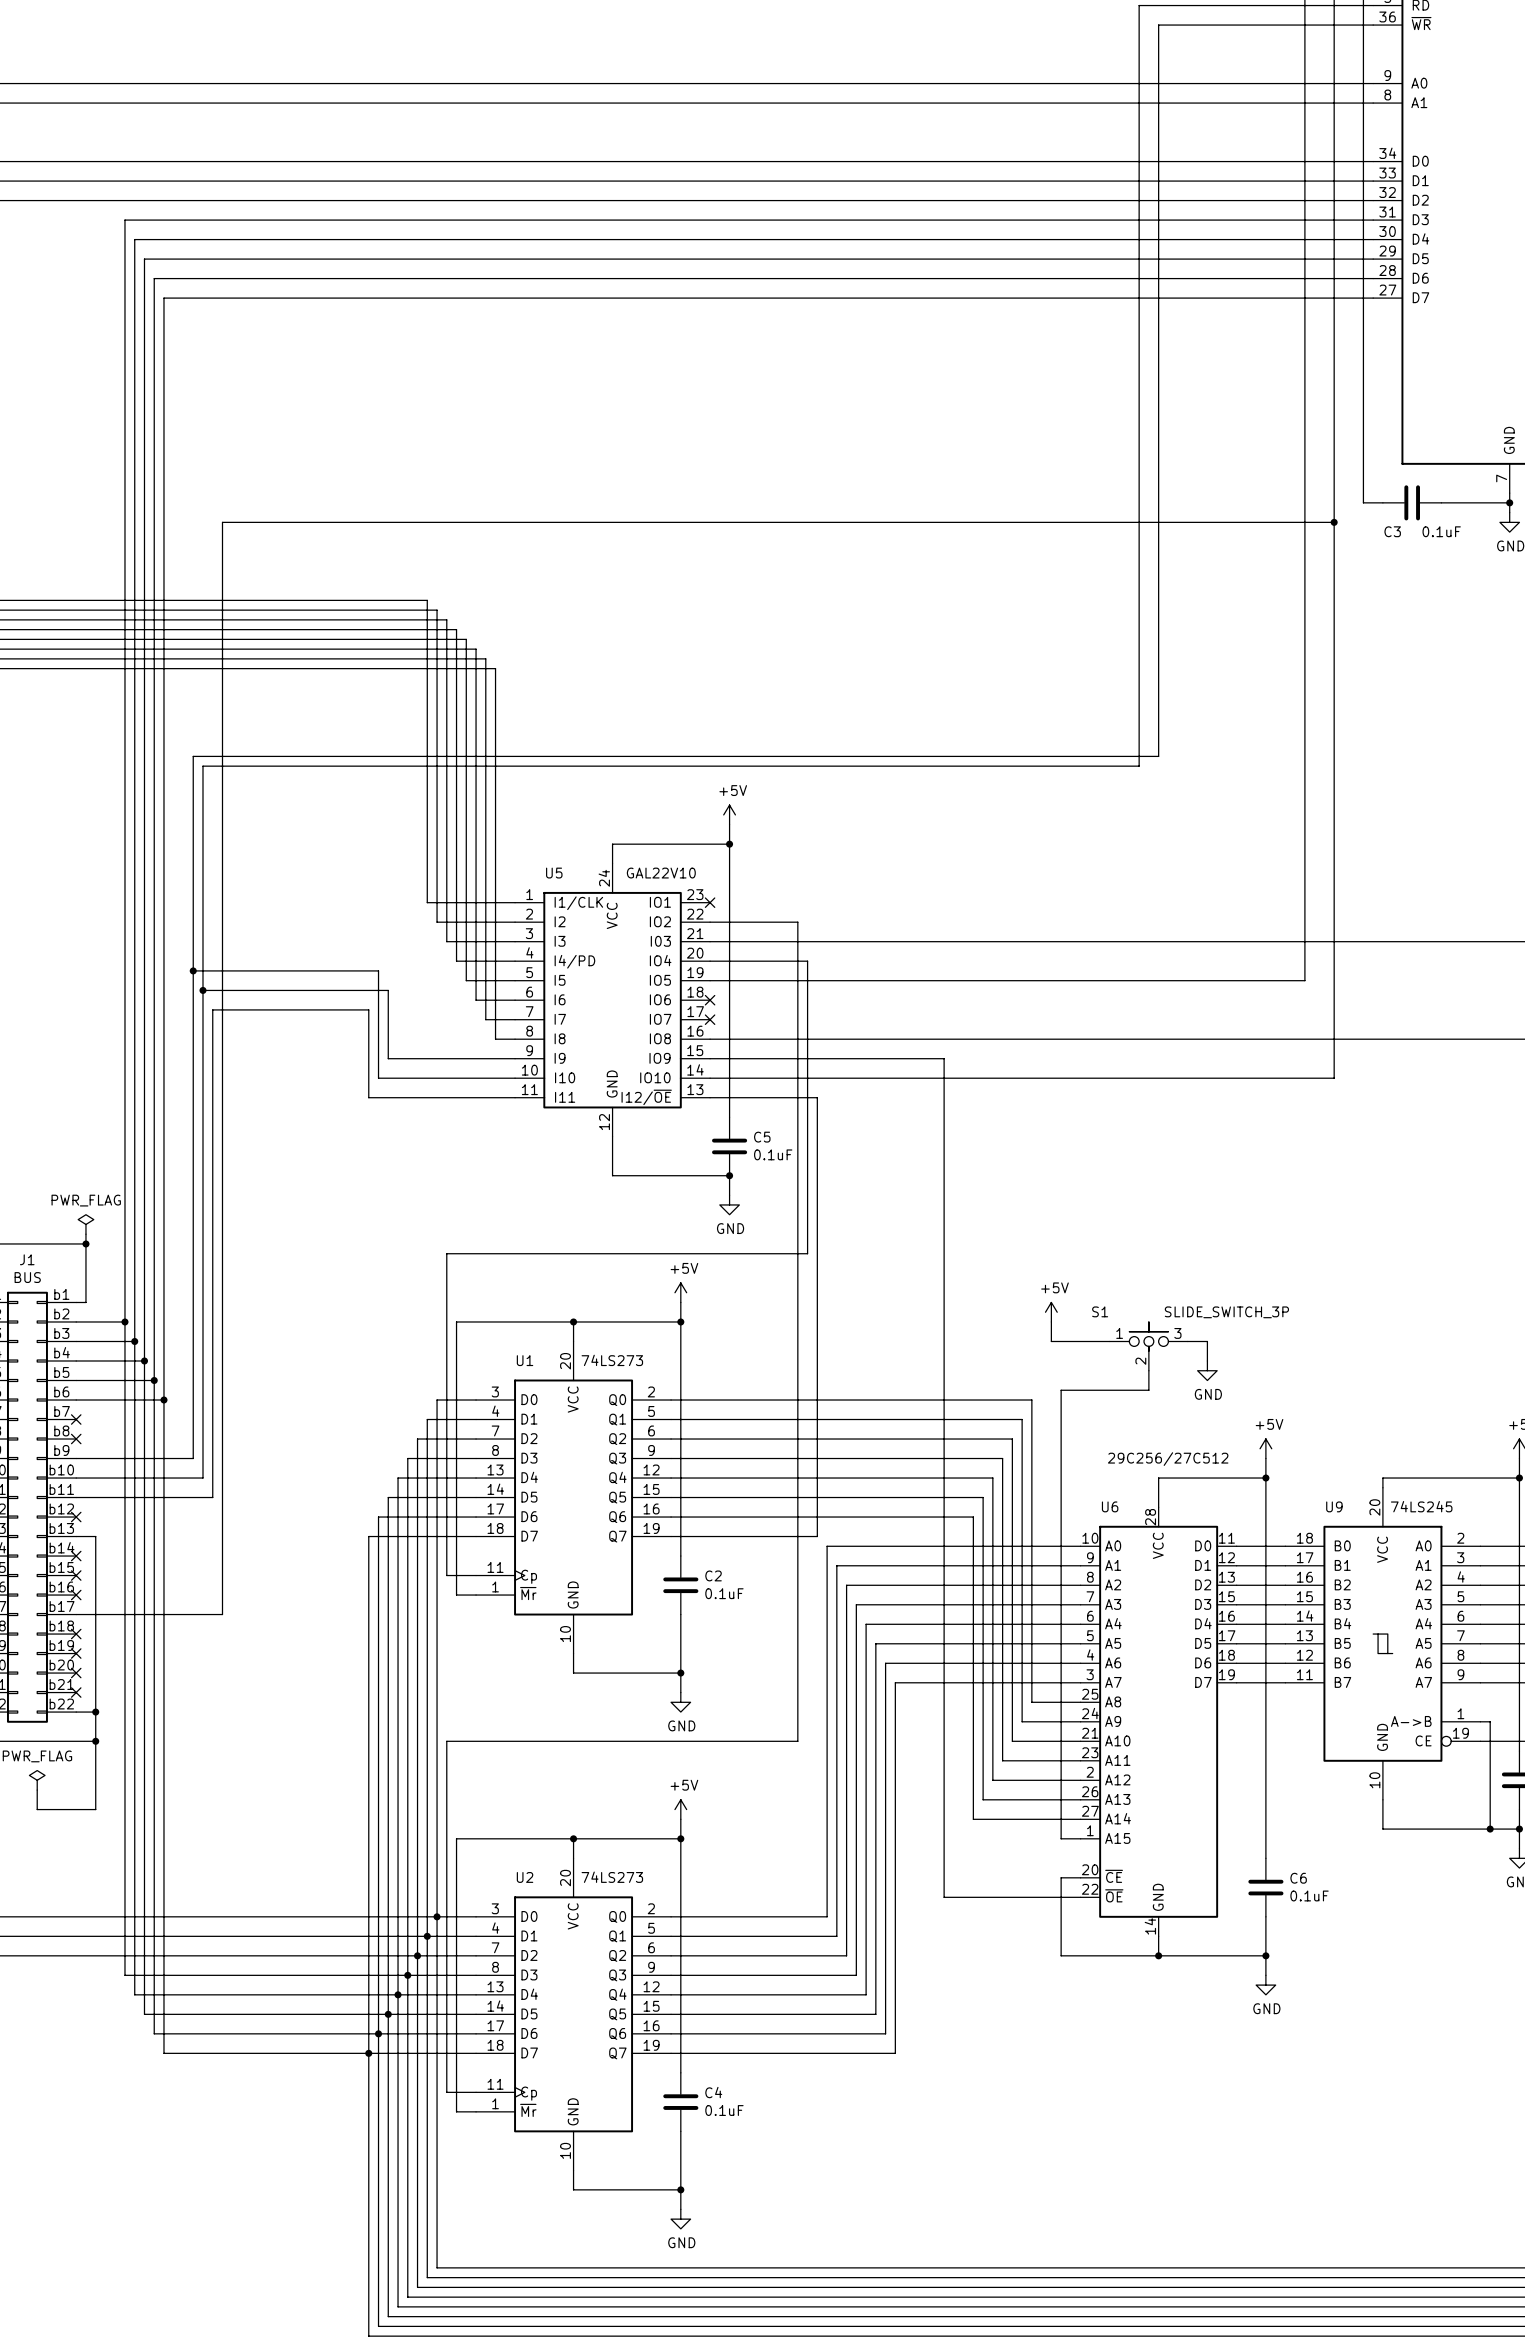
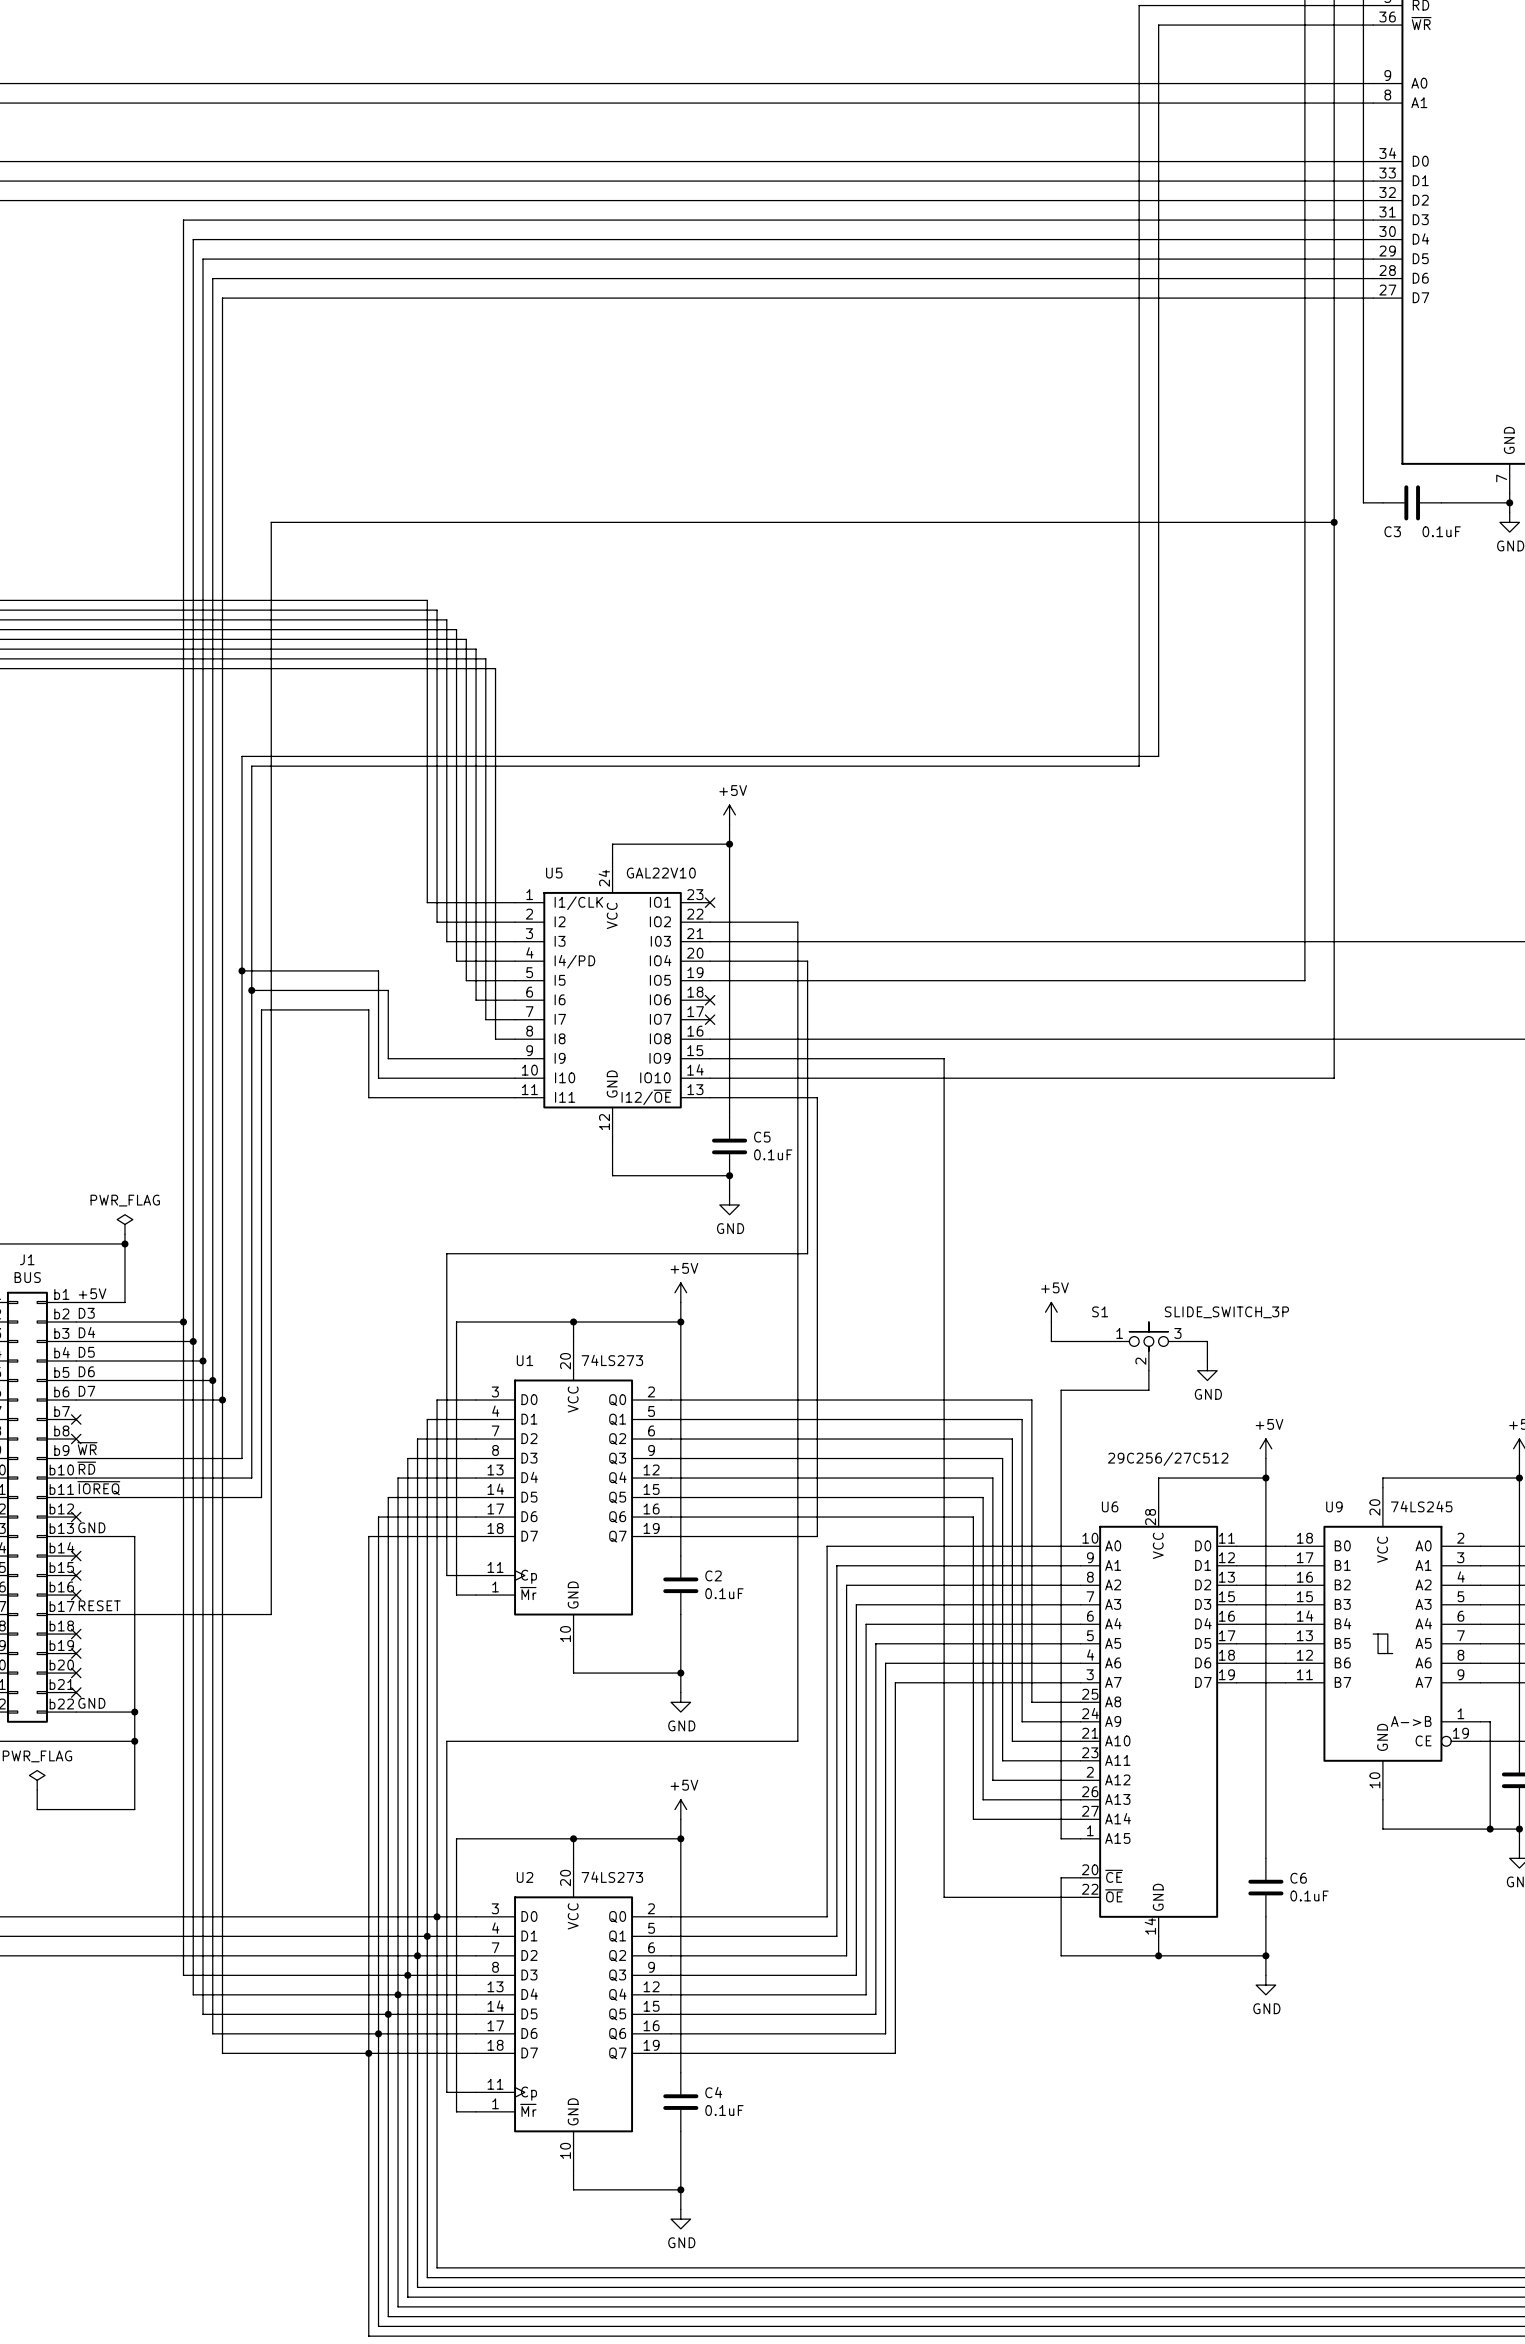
wire: (183, 220) (124, 220) (124, 1234) -> (183, 220) (183, 1975)
wire: (193, 239) (134, 239) (134, 1536) -> none
wire: (202, 259) (144, 259) (144, 2014) (202, 2014) -> (251, 766) (251, 1478) (202, 1478) (202, 2014)
wire: (212, 278) (154, 278) (154, 2033) (212, 2033) -> (261, 1009) (261, 1497) (212, 1497) (212, 2033)
wire: (222, 298) (163, 298) (163, 2053) (222, 2053) -> (271, 522) (271, 1614) (222, 1614) (222, 2053)
wire: (222, 522) (271, 522) -> (222, 522) (222, 298)
wire: (193, 756) (242, 756) -> (193, 756) (193, 239)
wire: none -> (242, 756) (242, 1458) (193, 1458) (193, 1994)
wire: (202, 766) (251, 766) -> (202, 766) (202, 259)
wire: (193, 970) (242, 970) -> none
junction: (193, 970) -> none
junction: none -> (242, 970)
wire: (202, 990) (251, 990) -> none
junction: (202, 990) -> none
junction: none -> (251, 990)
wire: (212, 1009) (261, 1009) -> (212, 1009) (212, 278)
power symbol position: PWR_FLAG (85, 1224) -> PWR_FLAG (124, 1224)
wire: (85, 1234) (85, 1302) -> (124, 1302) (85, 1302)
wire: none -> (85, 1243) (124, 1243)
junction: (85, 1243) -> none
junction: none -> (124, 1243)
label: none -> +5V (92, 1293)
wire: (124, 1302) (124, 1975) (183, 1975) -> none
label: none -> D3 (86, 1313)
wire: none -> (124, 1321) (183, 1321)
junction: (124, 1321) -> none
junction: none -> (183, 1321)
label: none -> D4 (86, 1332)
wire: none -> (134, 1341) (193, 1341)
junction: (134, 1341) -> none
junction: none -> (193, 1341)
label: none -> D5 (86, 1352)
wire: none -> (144, 1360) (202, 1360)
junction: (144, 1360) -> none
junction: none -> (202, 1360)
label: none -> D6 (86, 1371)
wire: none -> (154, 1380) (212, 1380)
junction: (154, 1380) -> none
junction: none -> (212, 1380)
label: none -> D7 (86, 1391)
wire: none -> (163, 1400) (222, 1400)
junction: (163, 1400) -> none
junction: none -> (222, 1400)
label: none -> ~{WR} (87, 1448)
label: none -> ~{RD} (86, 1468)
label: none -> ~{IOREQ} (98, 1488)
label: none -> GND (91, 1527)
wire: (95, 1536) (95, 1809) -> (95, 1536) (134, 1536)
label: none -> RESET (99, 1605)
label: none -> GND (91, 1703)
wire: none -> (95, 1712) (134, 1712)
junction: (95, 1712) -> none
junction: none -> (134, 1712)
wire: none -> (95, 1741) (134, 1741)
junction: (95, 1741) -> none
junction: none -> (134, 1741)
wire: (134, 1809) (134, 1994) (193, 1994) -> (134, 1809) (95, 1809)

